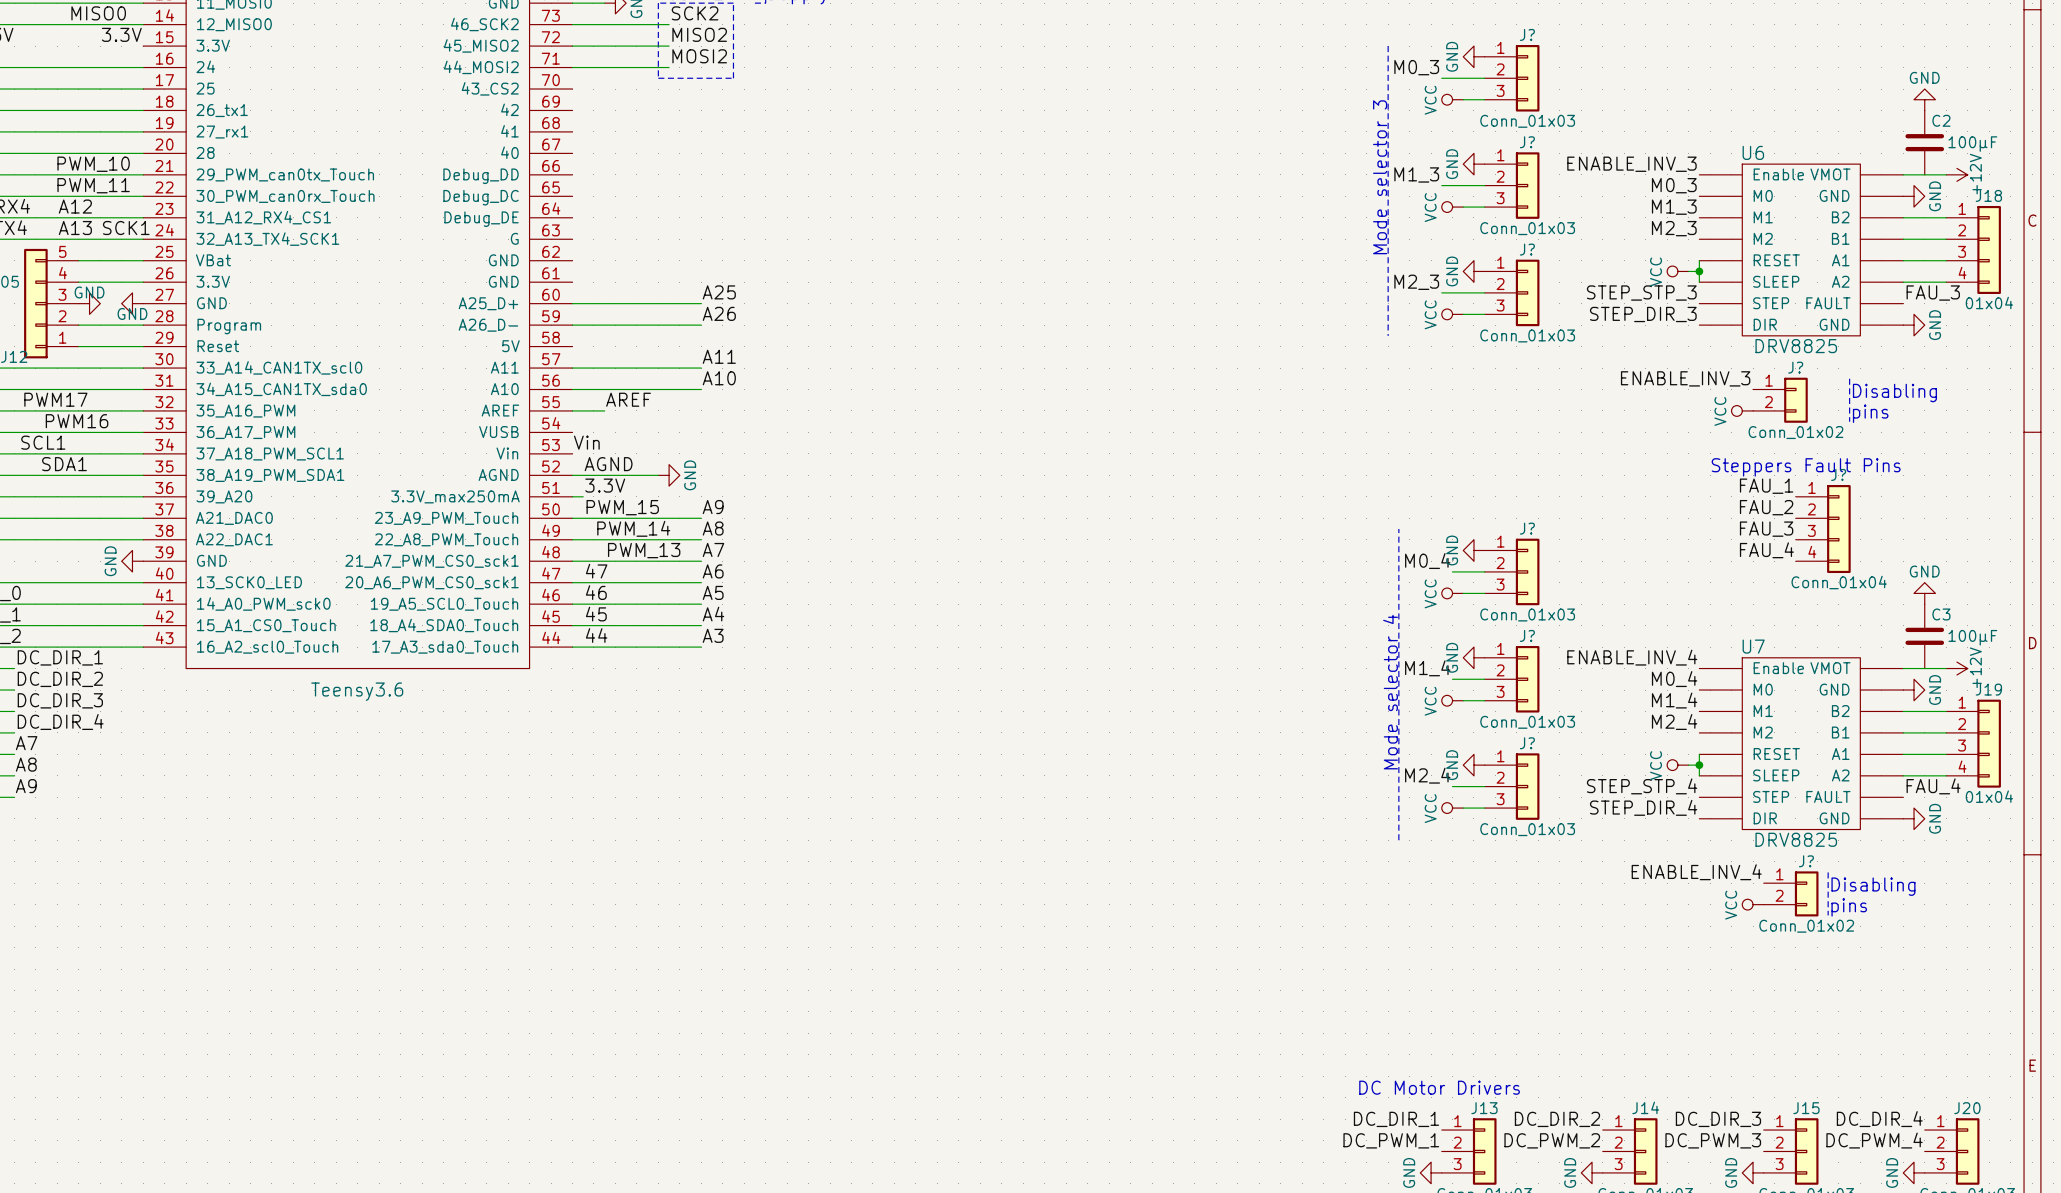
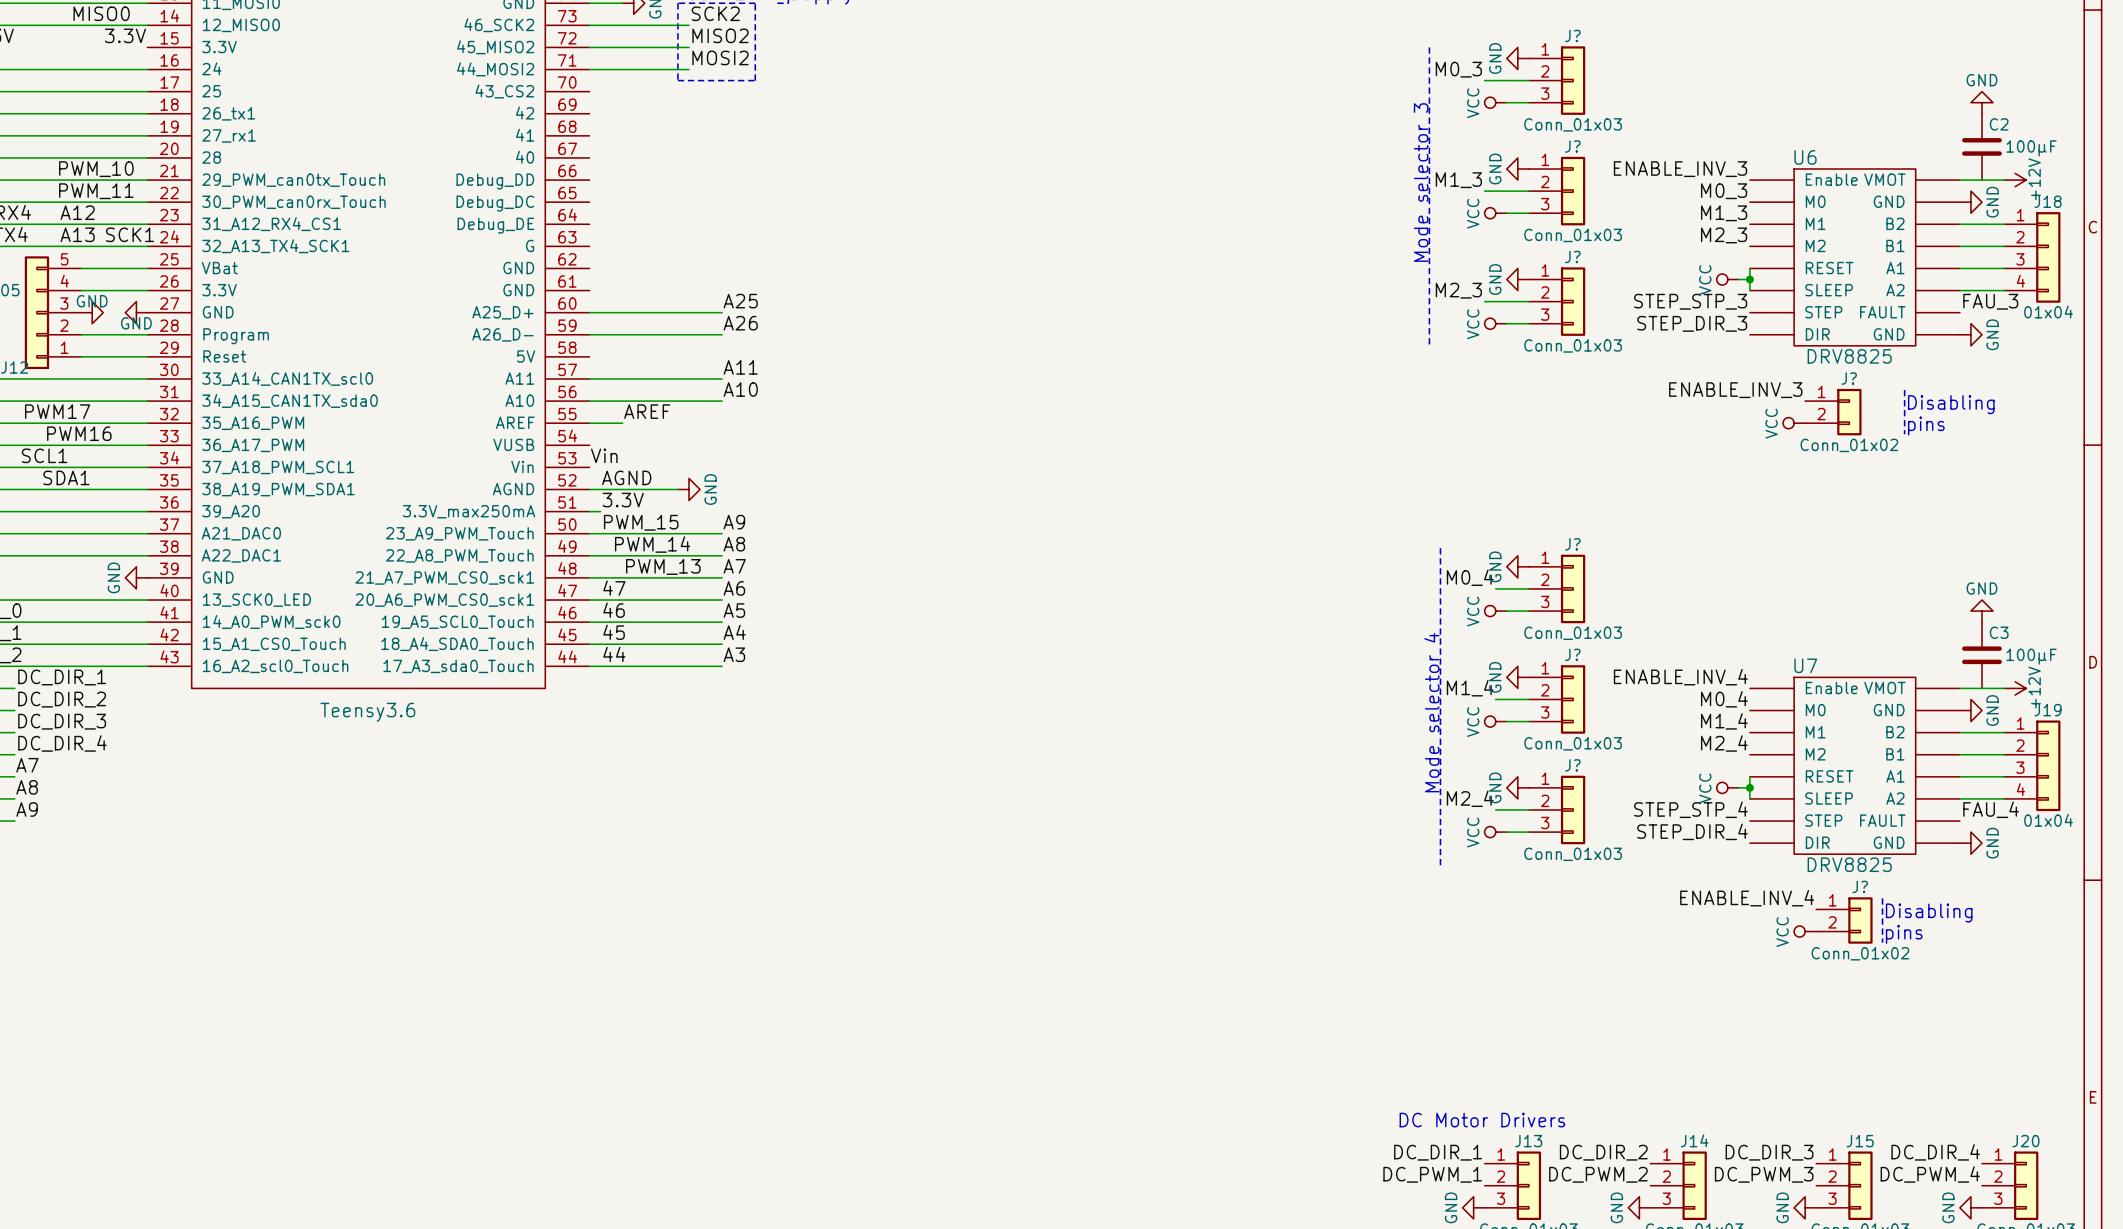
text: Steppers Fault Pins (1806, 467) -> none
label: FAU_1 (1766, 486) -> none
label: FAU_2 (1766, 507) -> none
label: FAU_3 (1766, 529) -> none
J?: Conn_01x04 (1823, 529) -> none
label: FAU_4 (1766, 550) -> none

